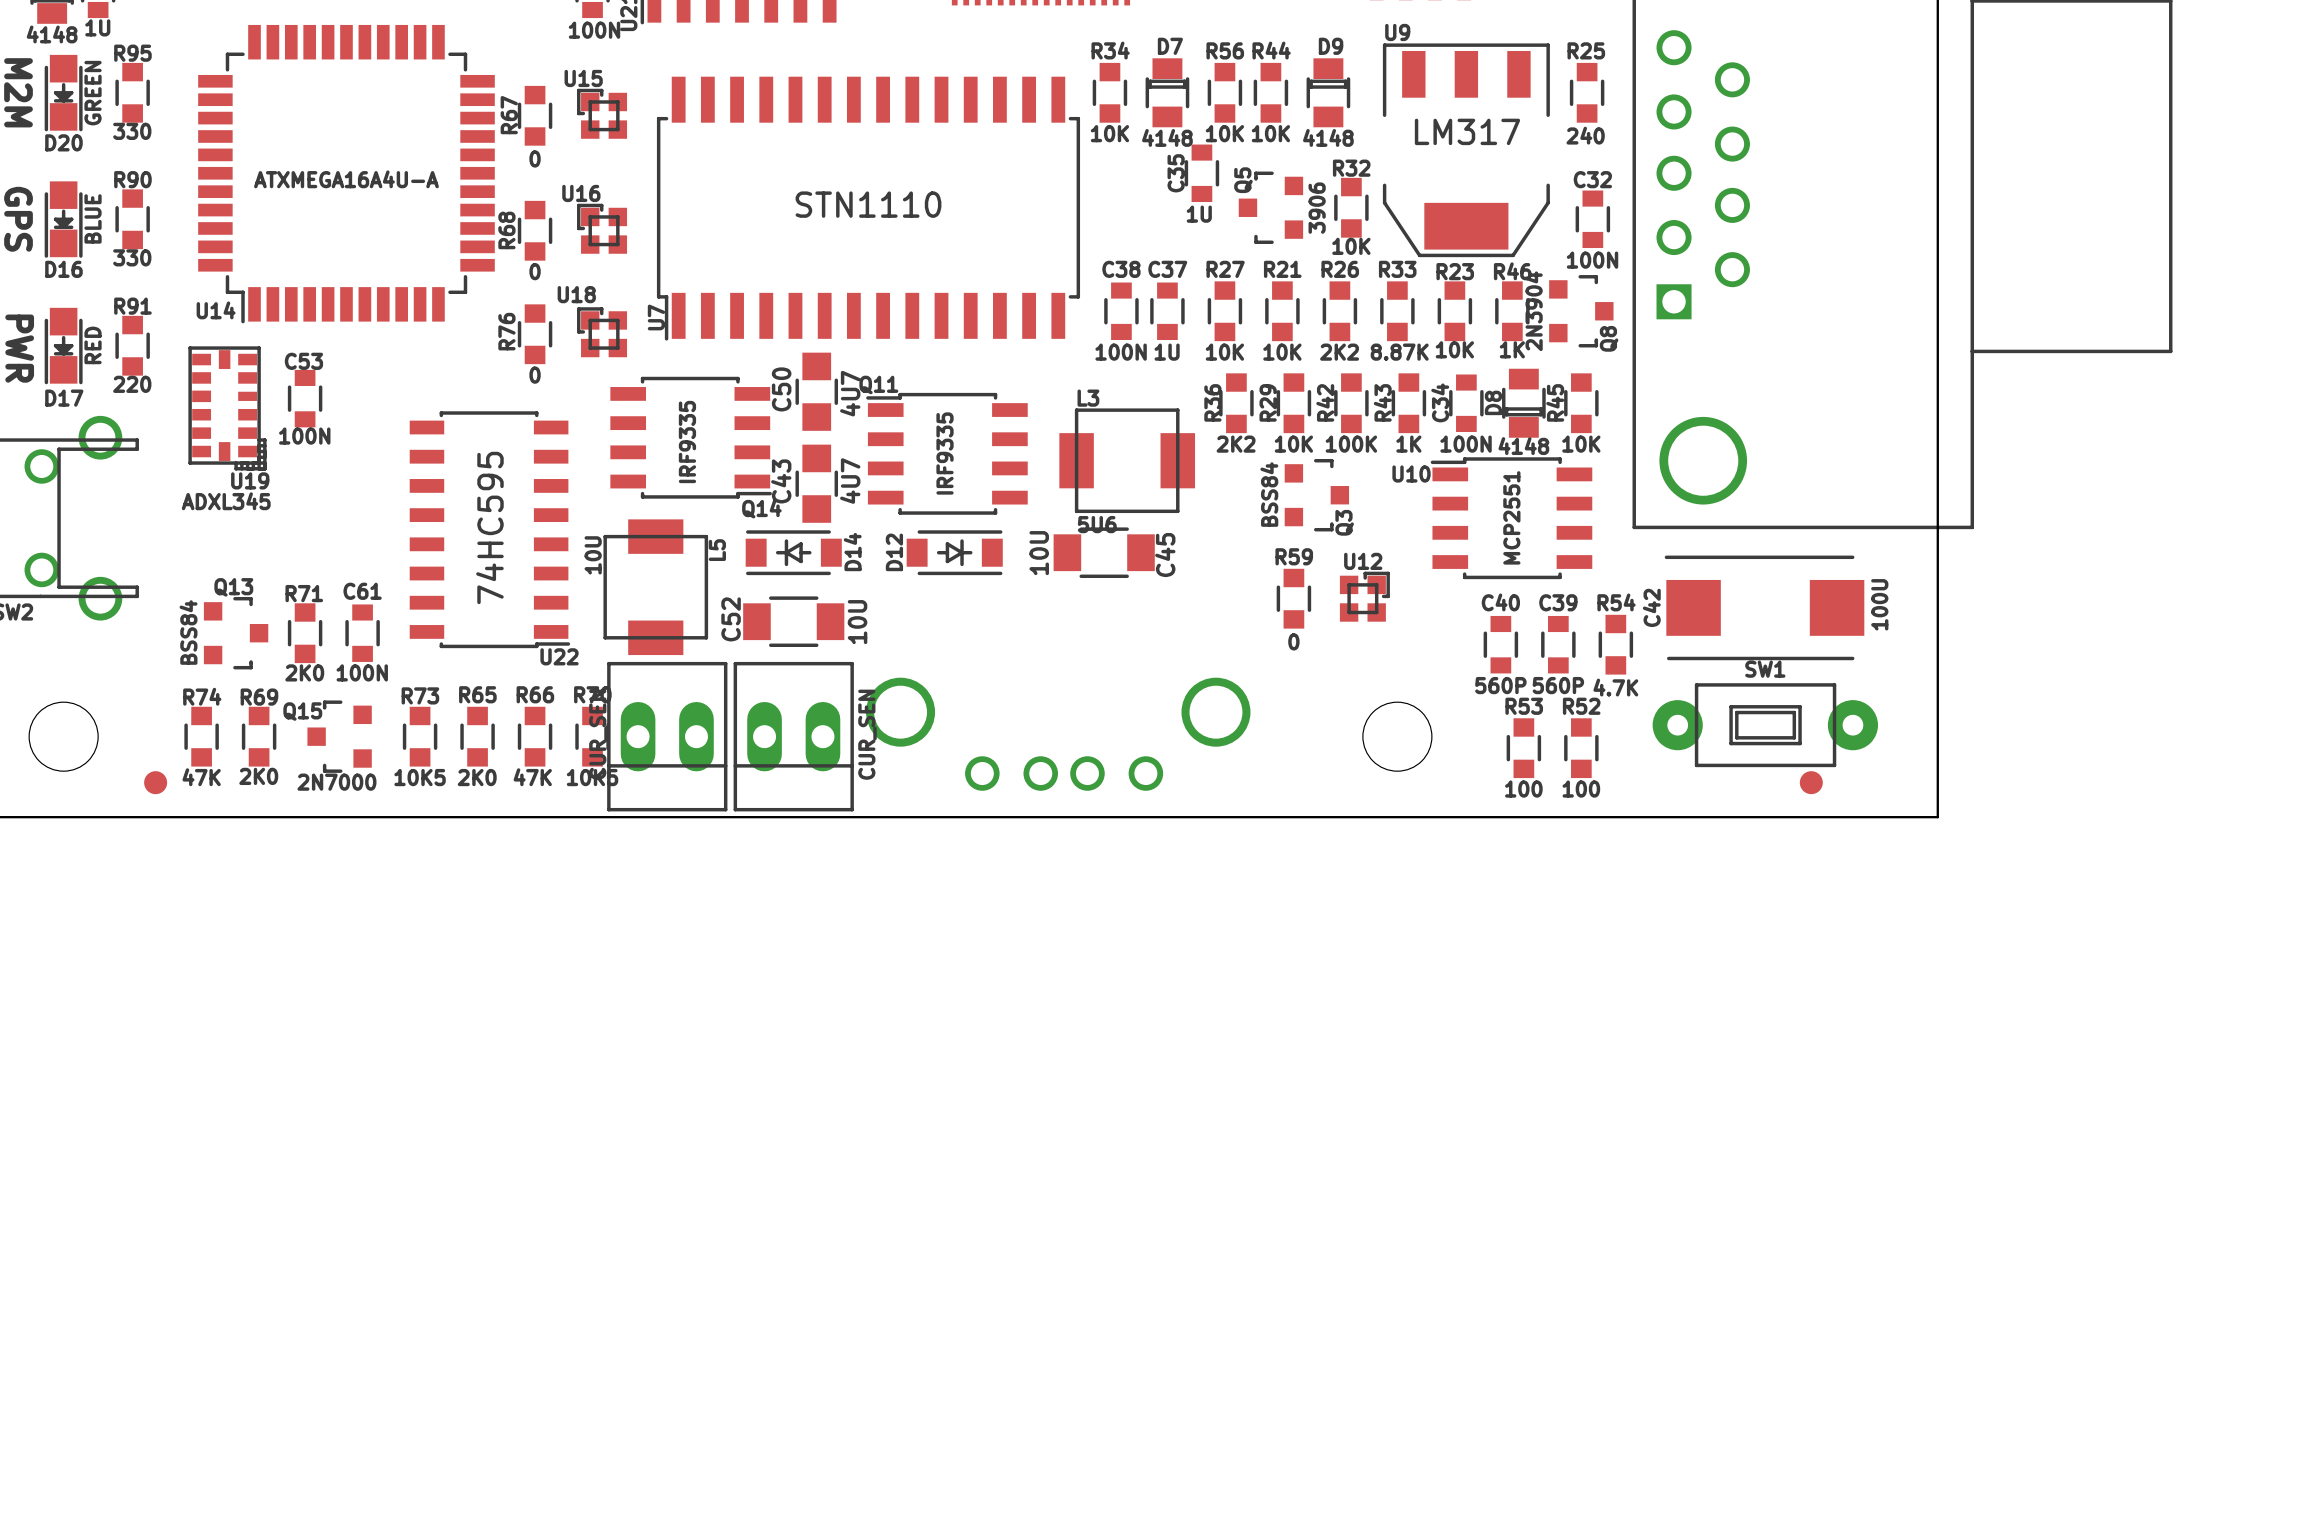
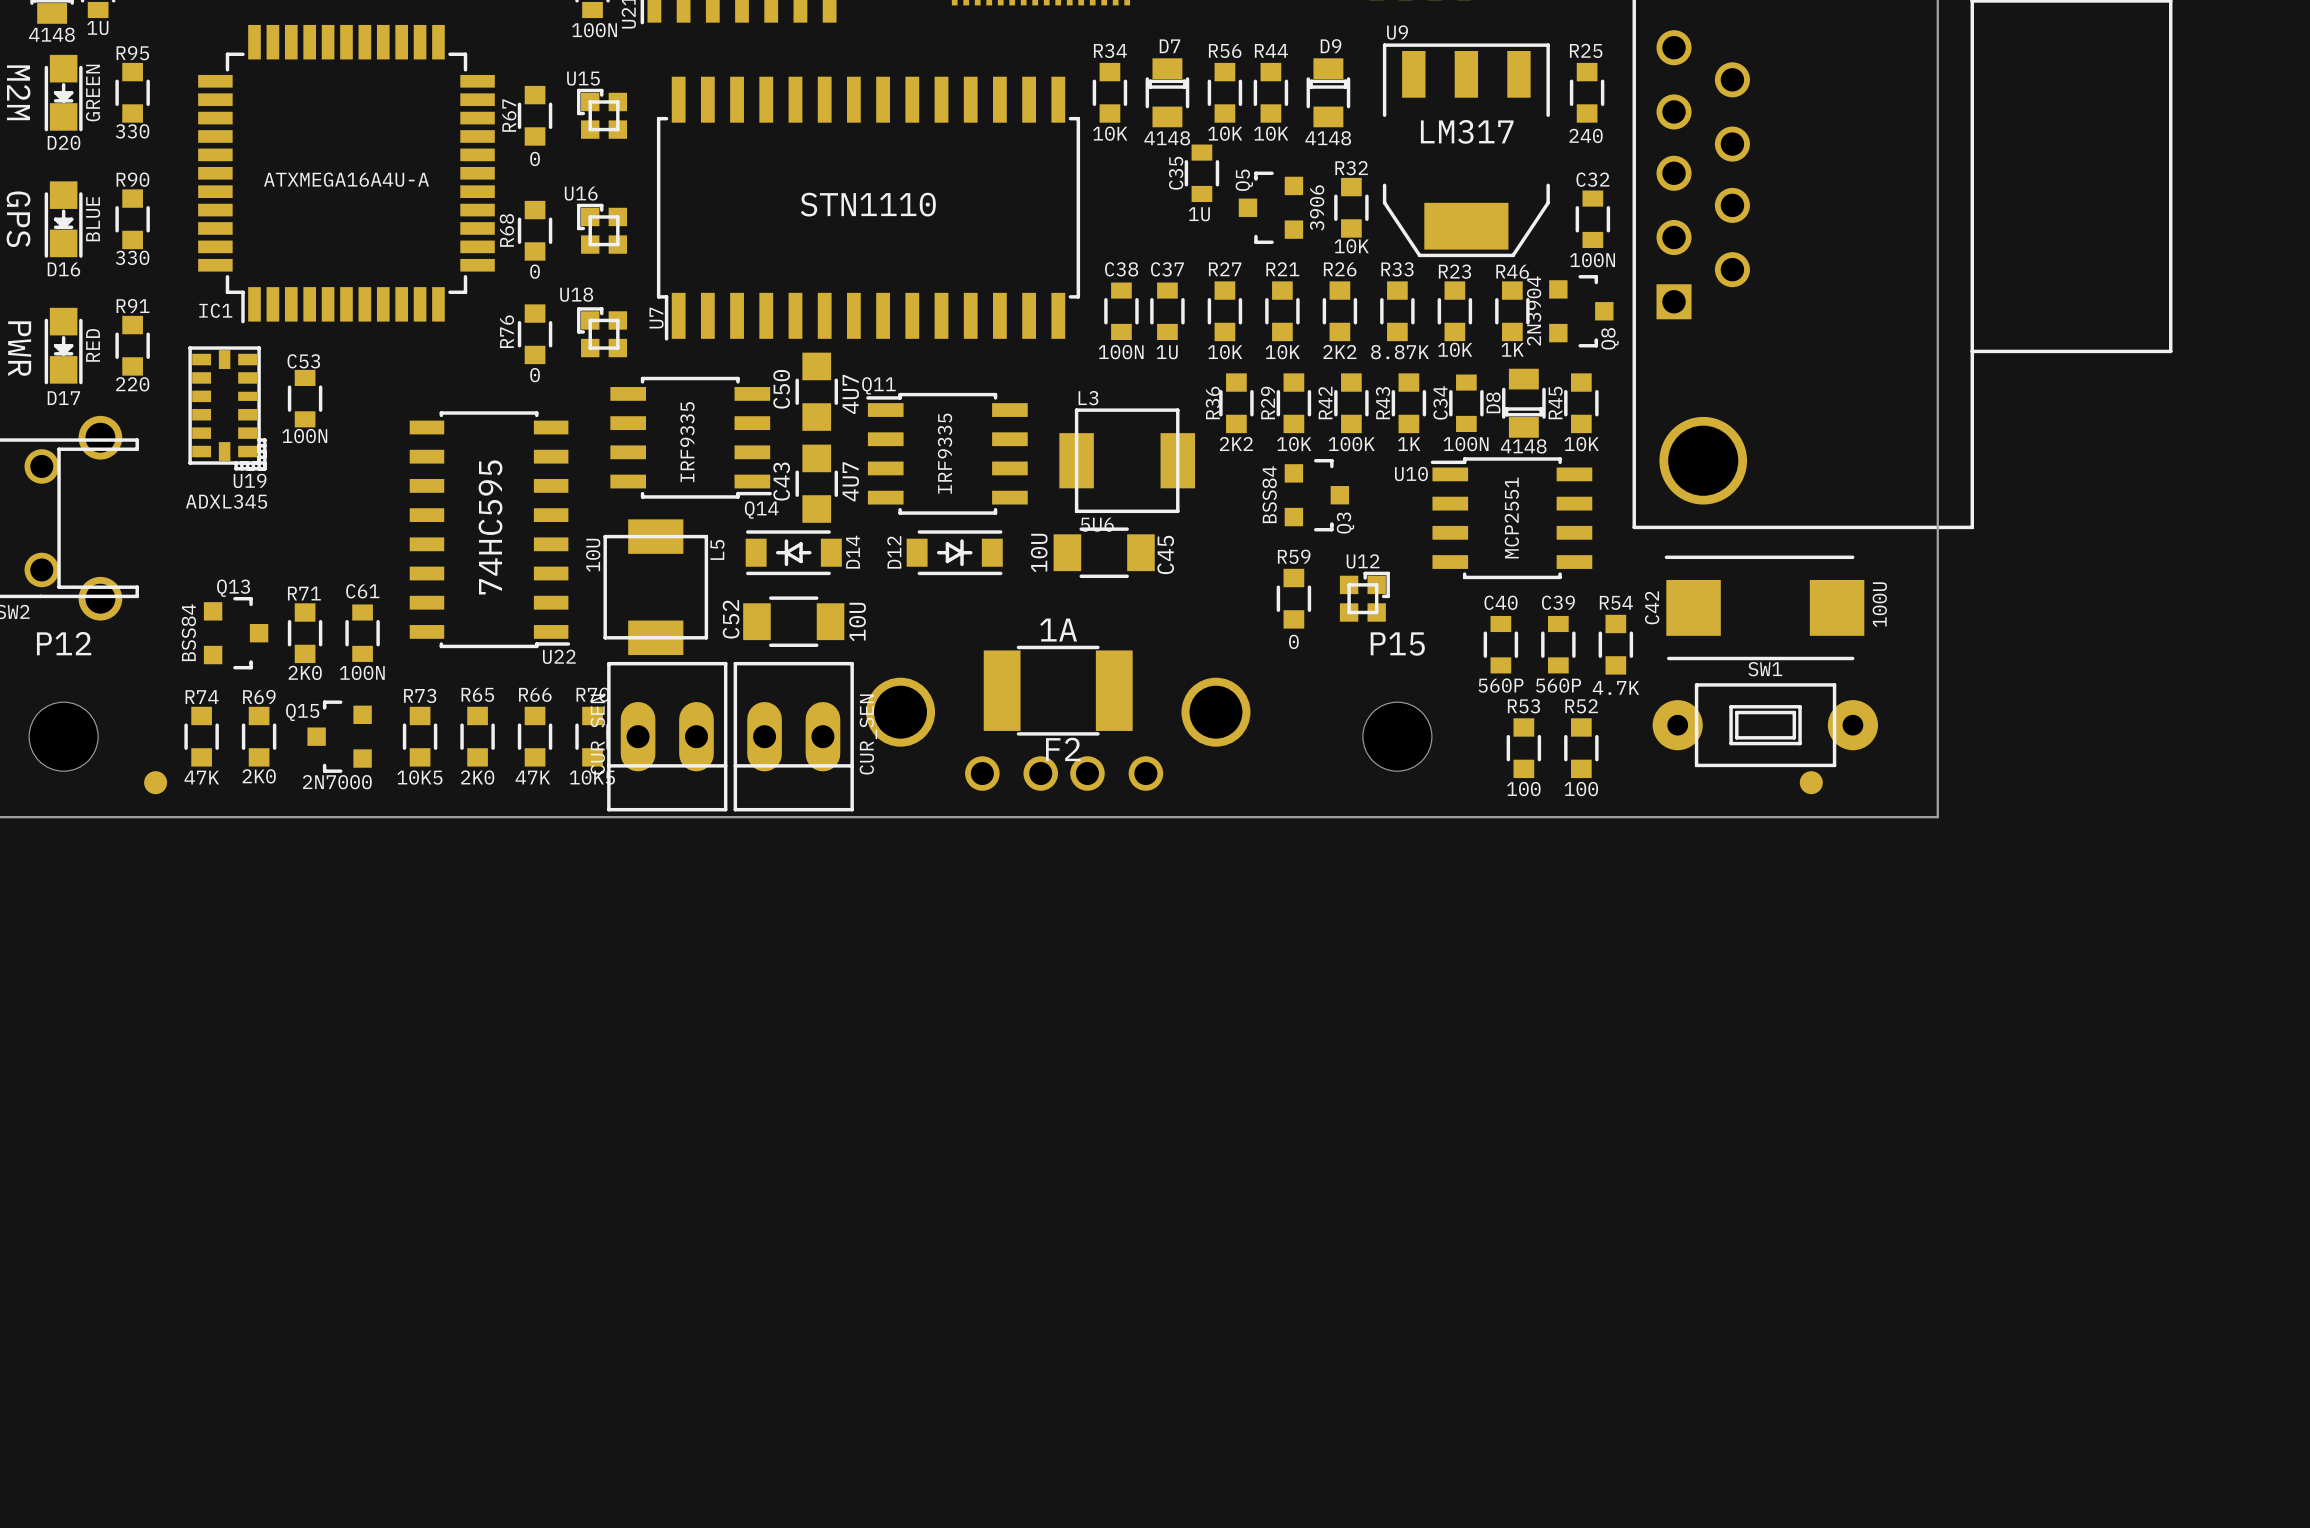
U14 name: U14 (216, 310) -> IC1 (215, 310)
P12 name: none -> P12 (64, 643)
P15 name: none -> P15 (1397, 644)
F2: none -> 1A (1058, 690)

